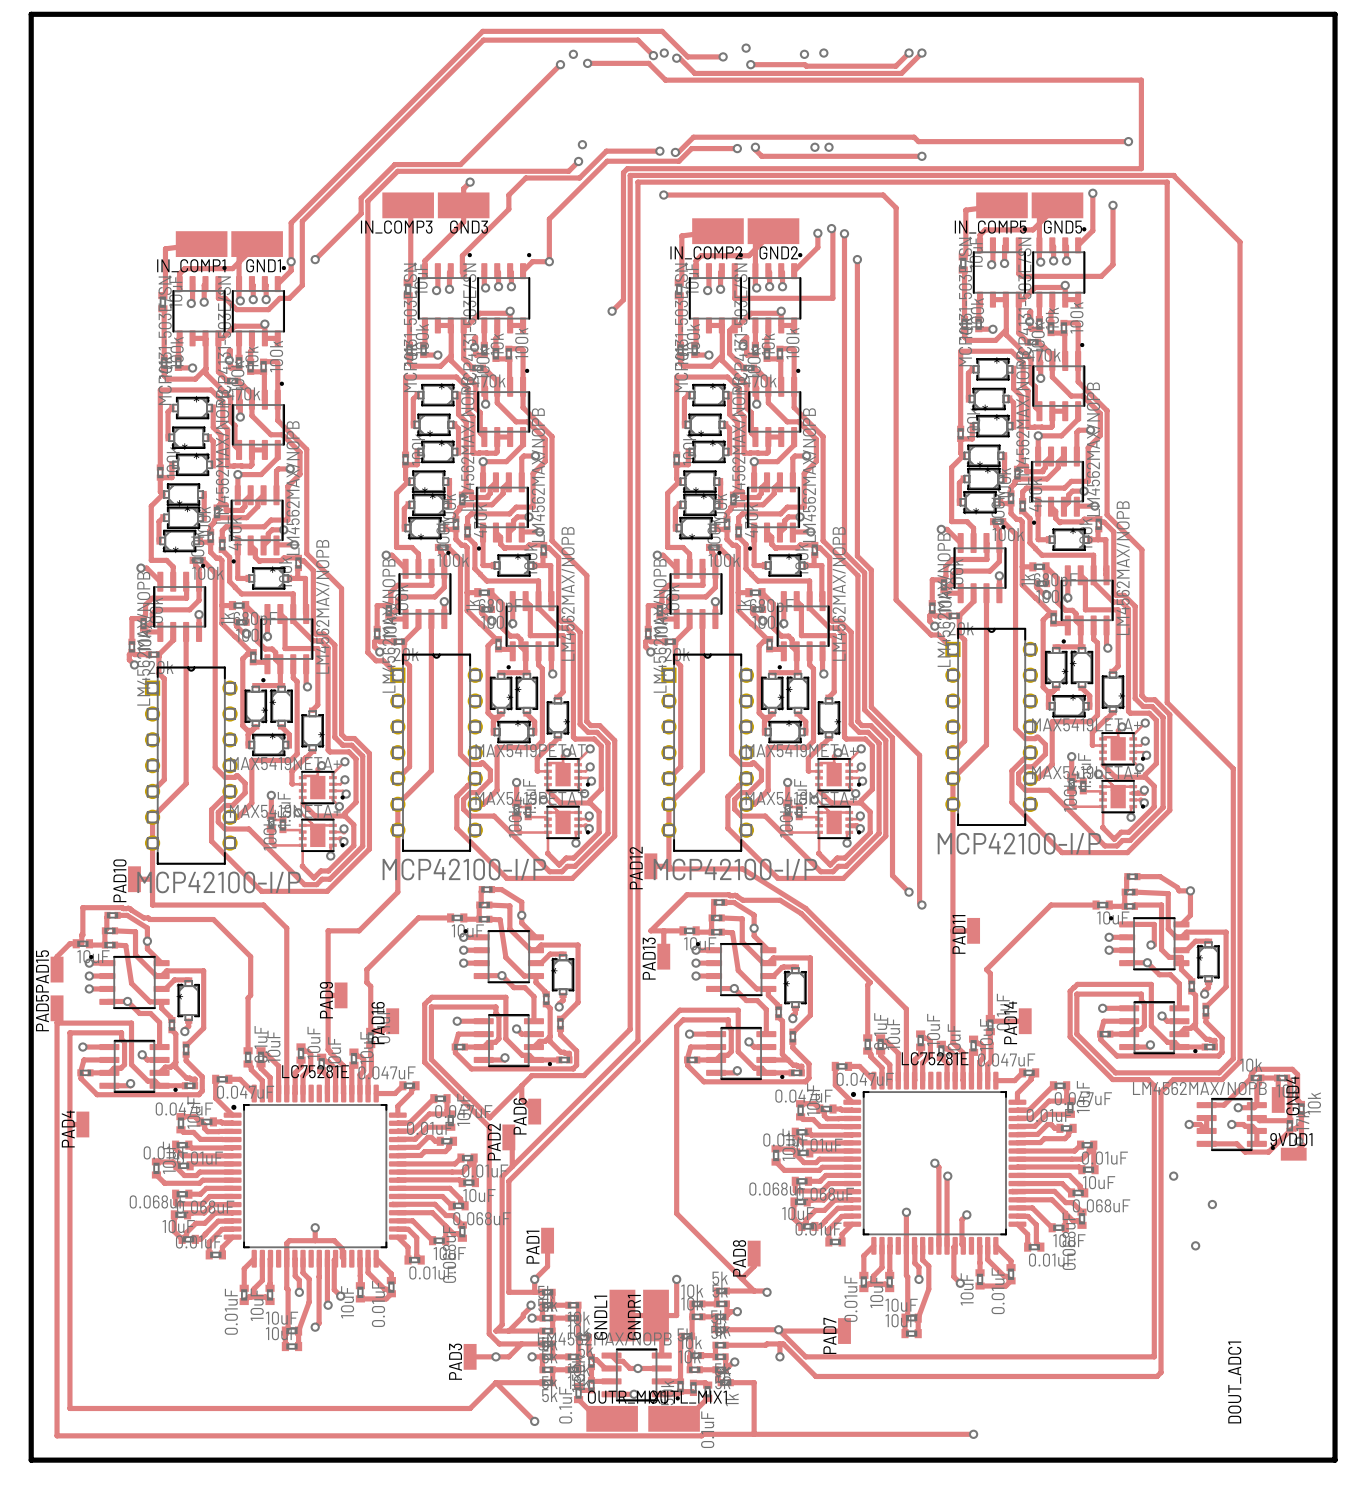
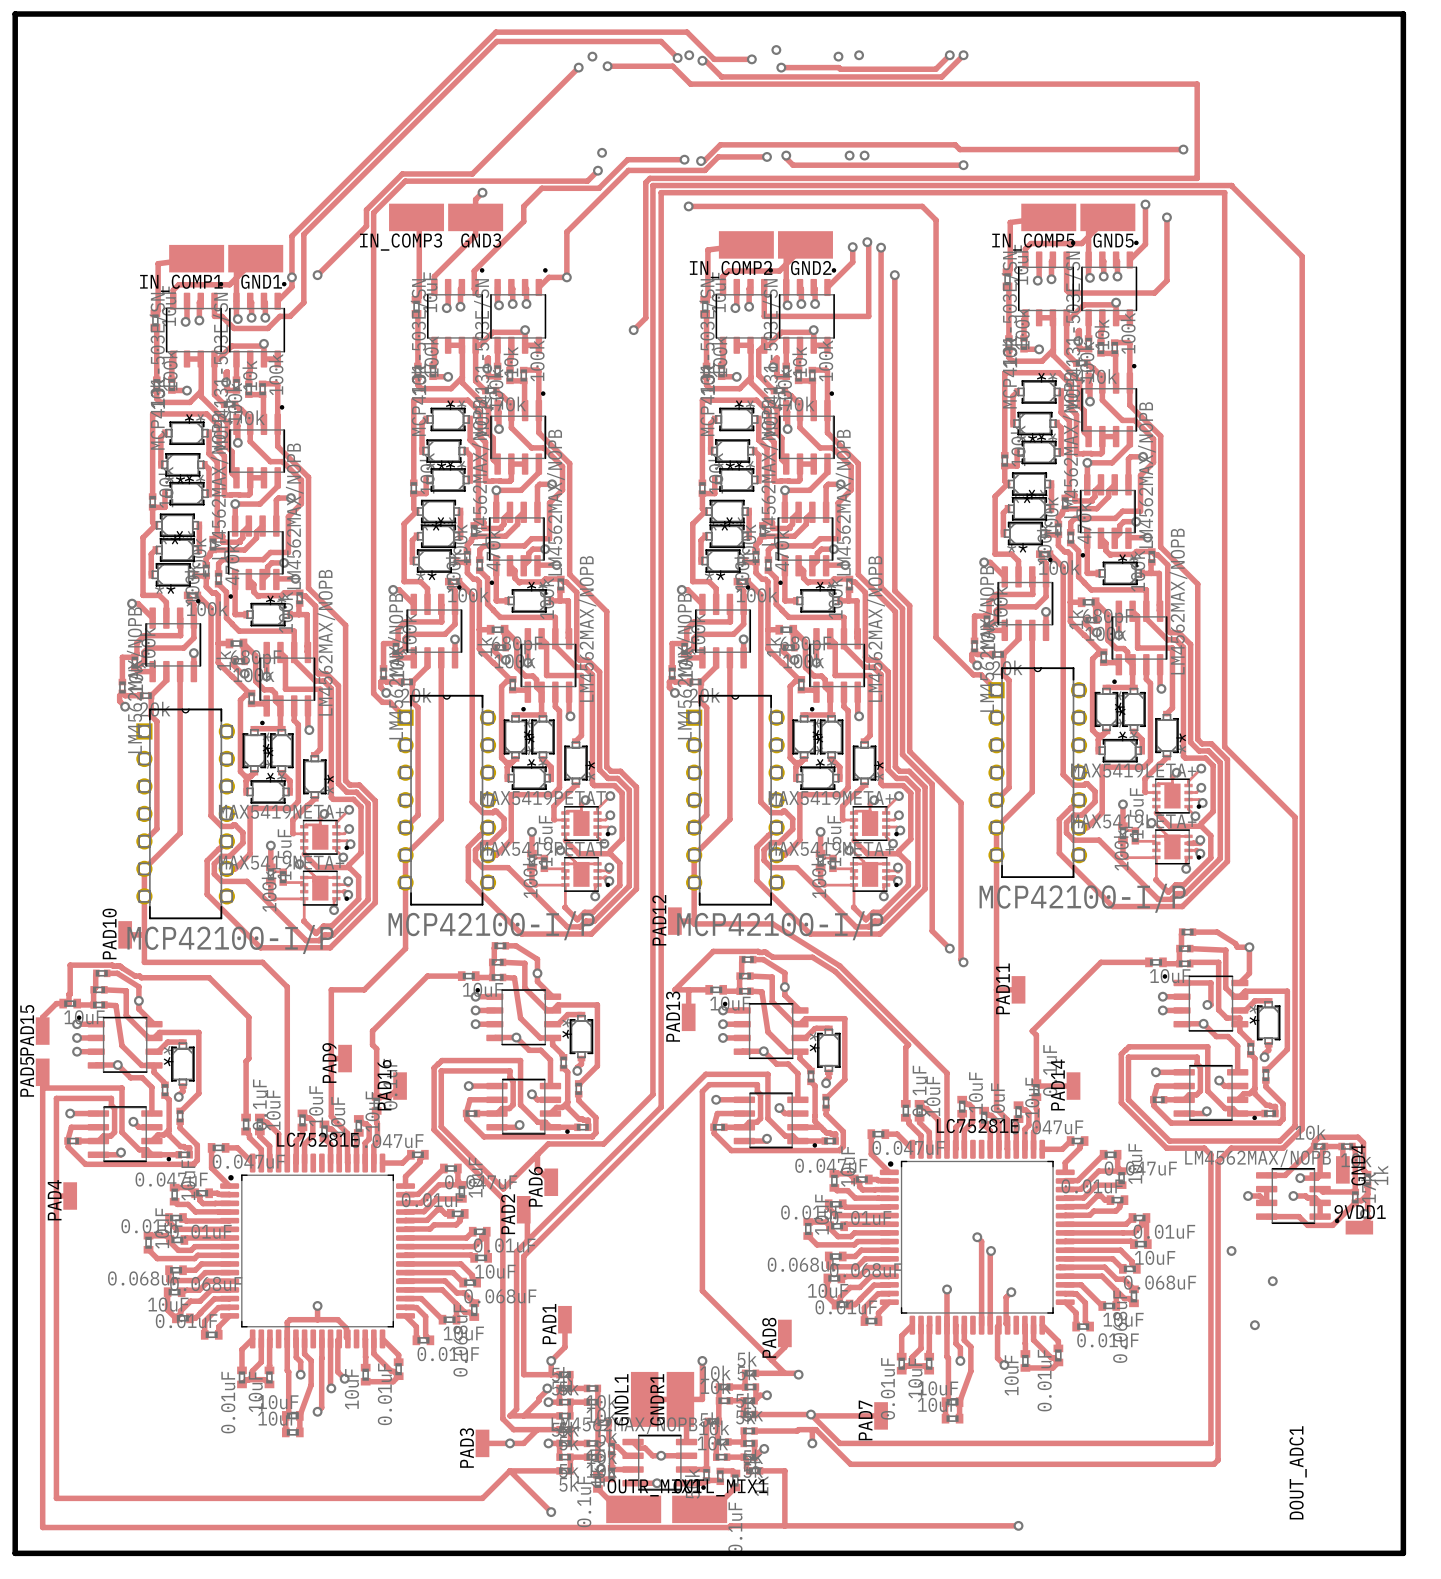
part value: 10k (1314, 1103) -> 1k (1380, 1175)

